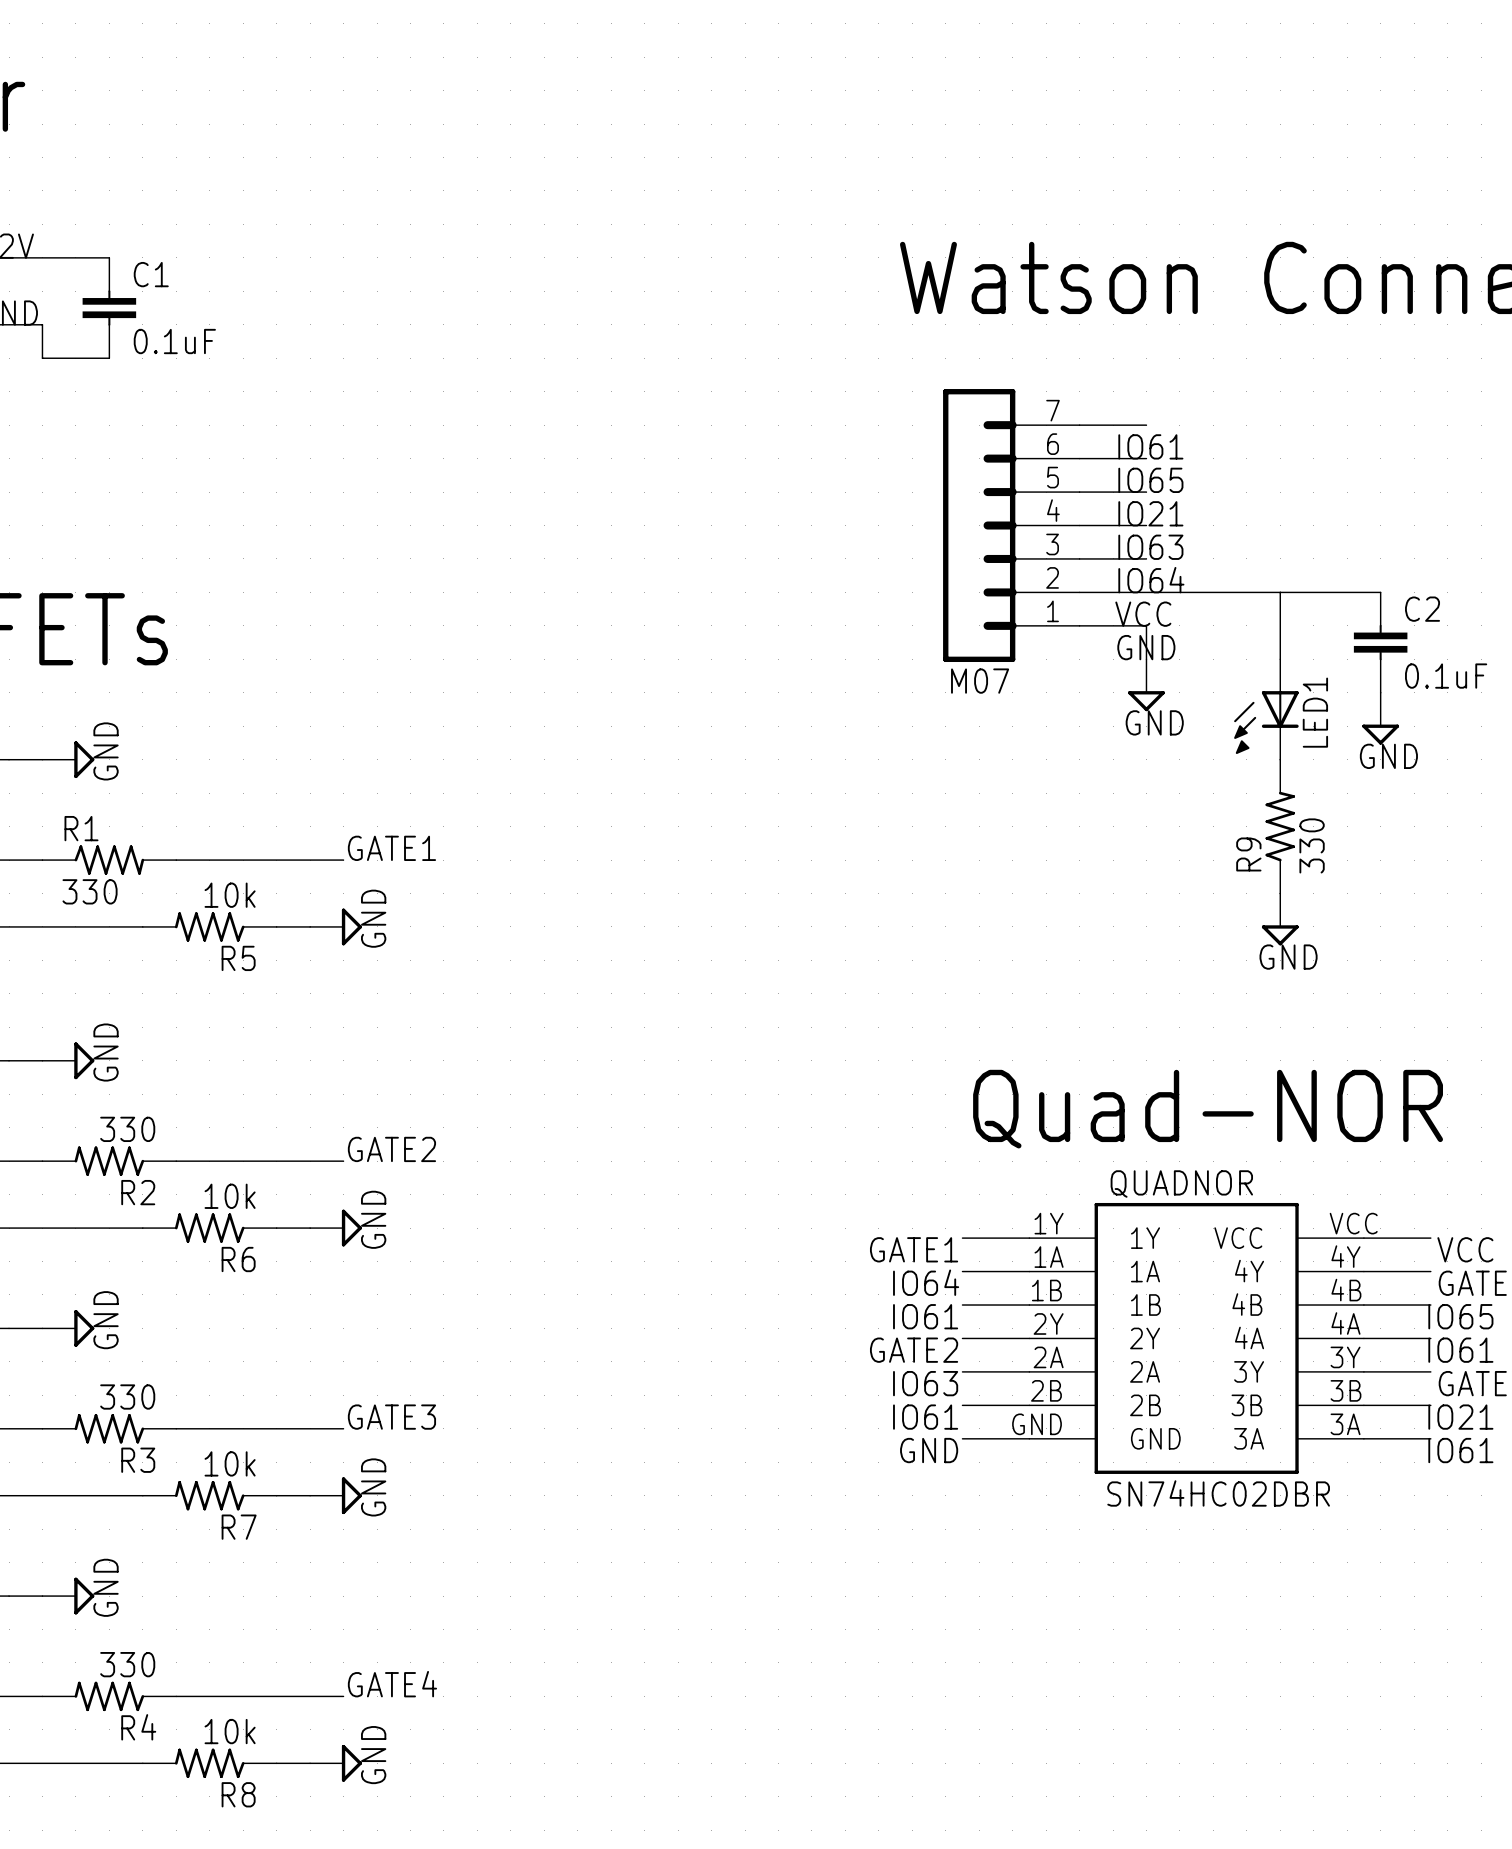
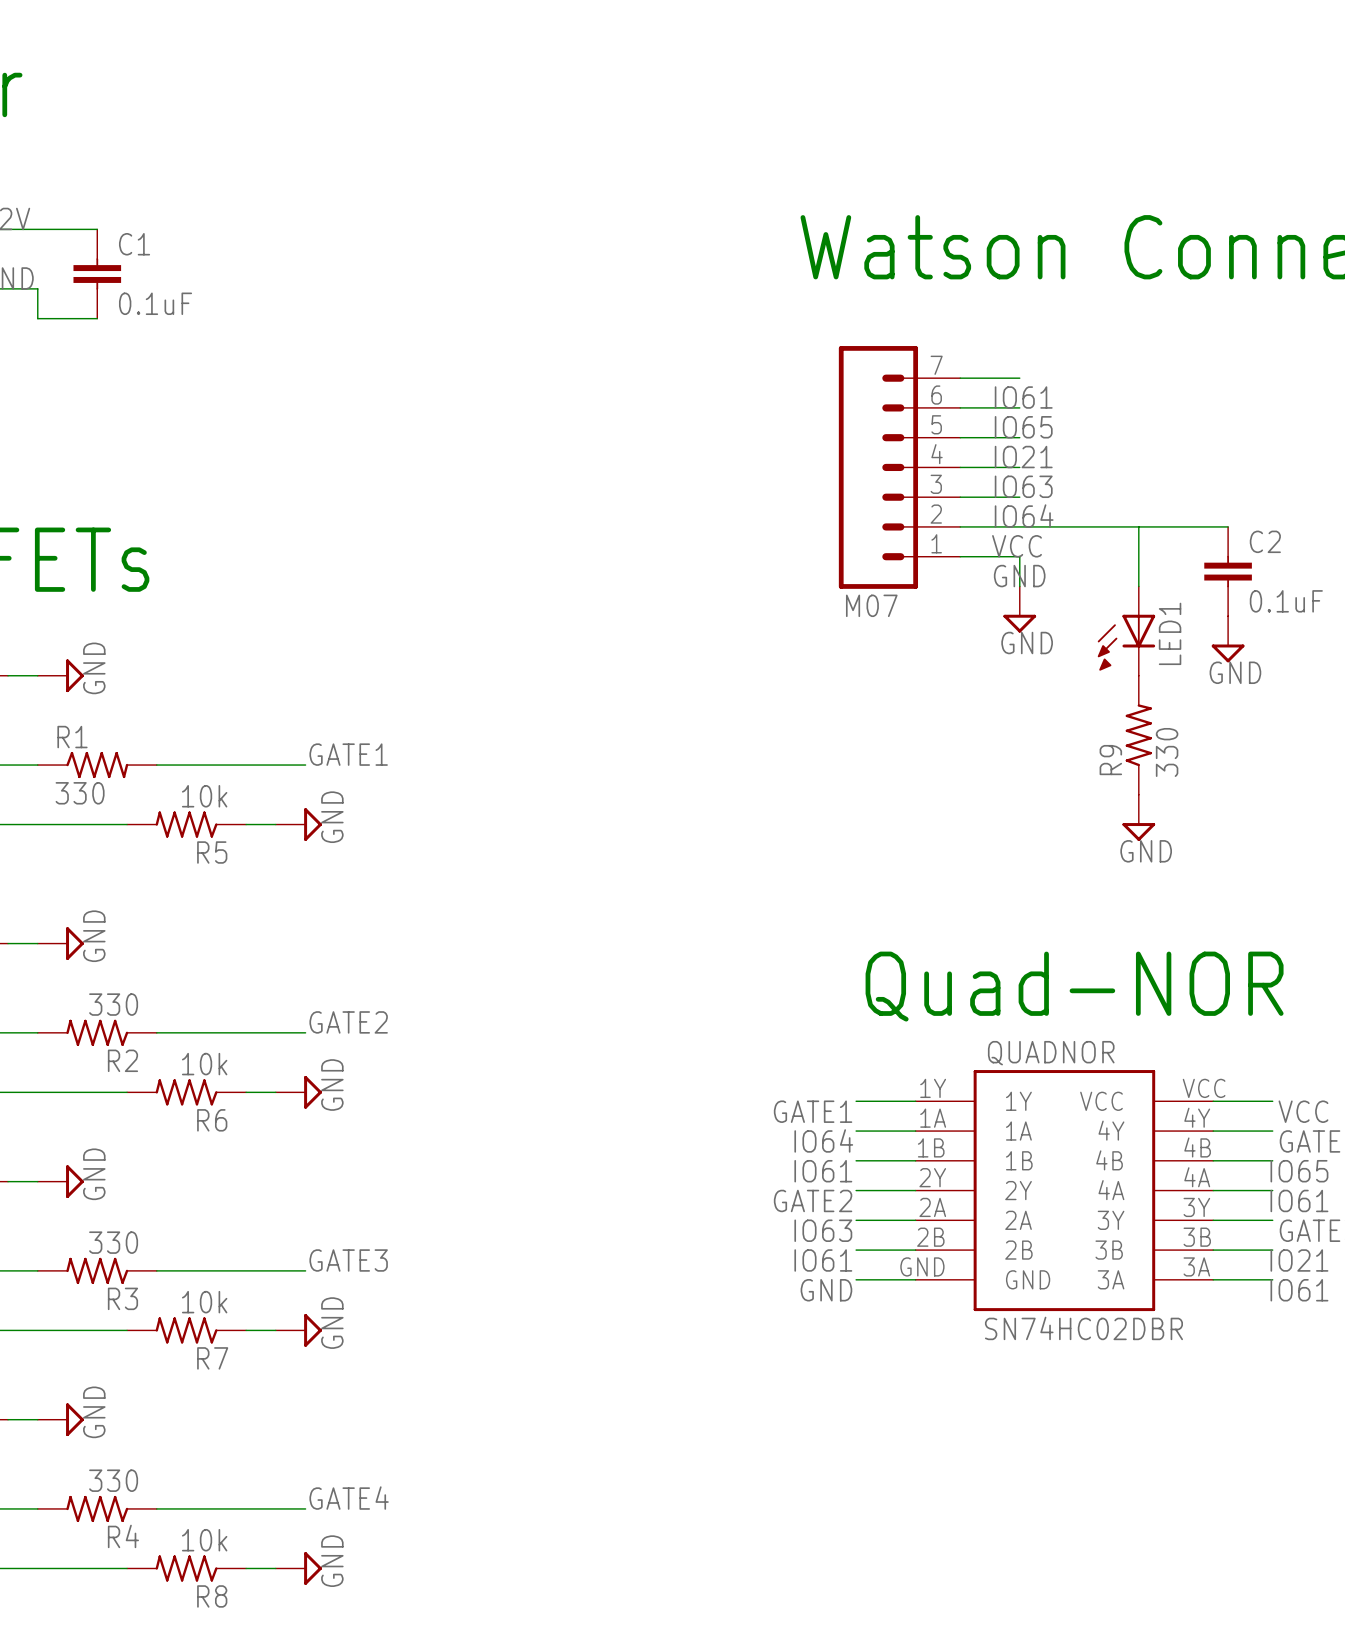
part symbol: [943, 389, 1080, 663] -> [838, 346, 961, 589]

